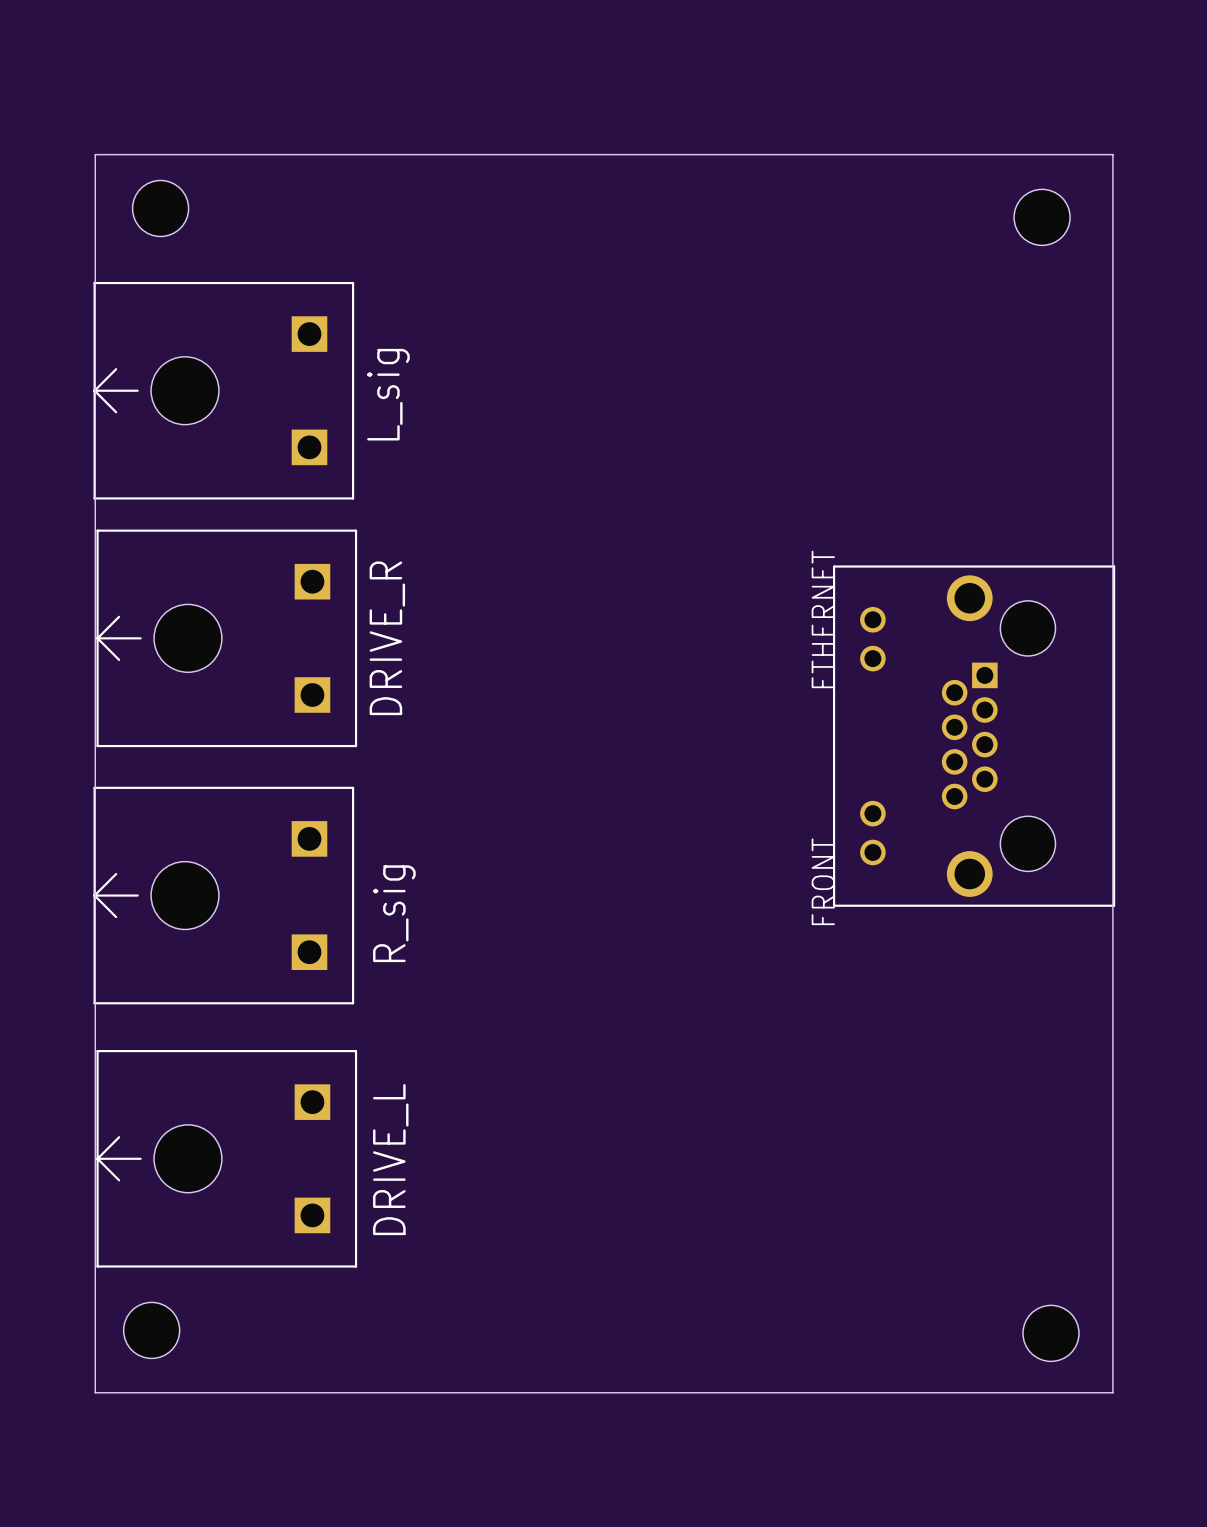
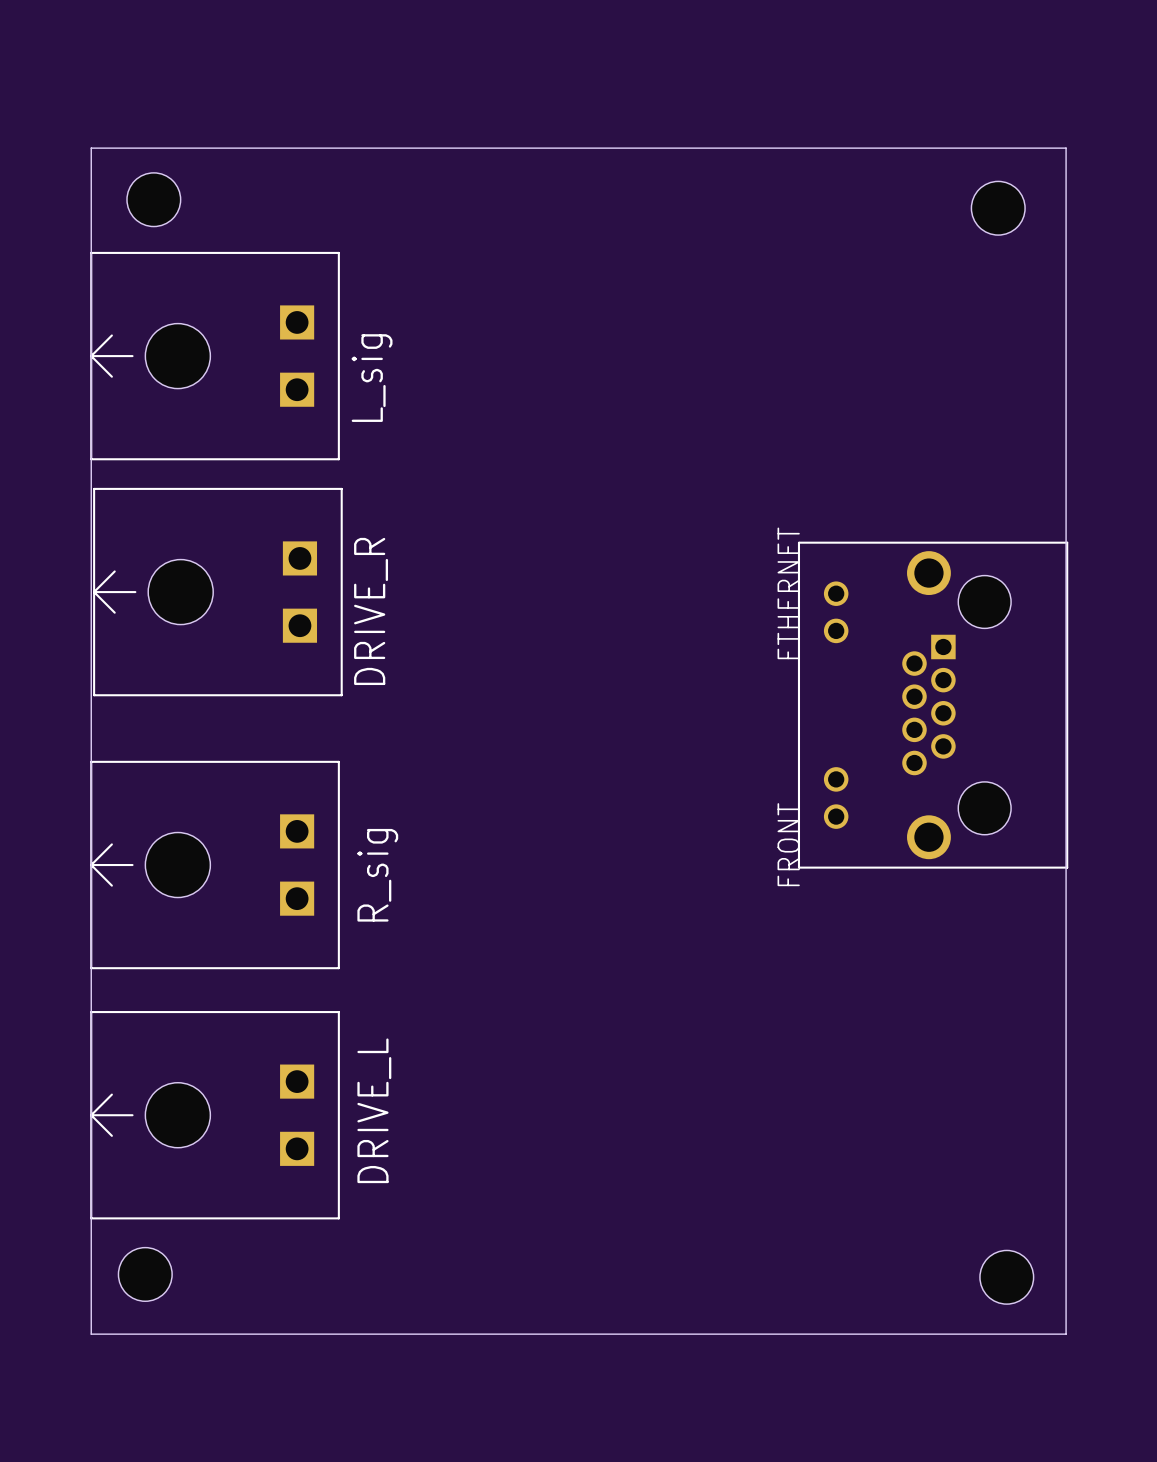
part: none -> (215, 356)
part: (223, 390) -> none
part: none -> (217, 592)
part: (226, 638) -> none
part footprint: [93, 786, 355, 1005] -> [90, 760, 340, 970]
part footprint: [96, 1050, 358, 1268] -> [90, 1011, 340, 1220]

